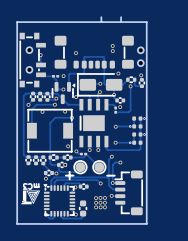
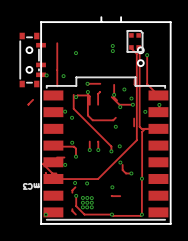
board edge: (41, 22) (17, 22) (17, 223) (41, 223) -> (41, 22) (41, 223)
board edge: (146, 22) (146, 223) -> (146, 22) (170, 22) (170, 223) (146, 223)
part: none -> (135, 41)
track: none -> (57, 43) (57, 86)
track: none -> (131, 47) (136, 53) (136, 140) (98, 179) (53, 179)
track: none -> (138, 47) (139, 126) (141, 128) (158, 128)
part: (94, 52) -> none
track: (40, 55) (41, 64) -> none
via: (40, 55) -> none
track: none -> (147, 55) (147, 84) (158, 95)
via: none -> (147, 55)
via: (118, 73) -> none
track: (41, 74) (53, 76) (56, 80) (56, 86) (59, 89) (63, 89) -> none
via: none -> (46, 75)
via: (141, 75) -> none
part: (55, 76) -> none
track: (127, 79) (122, 84) (105, 84) (104, 57) (85, 56) (84, 72) (70, 73) (69, 86) -> none
part: (131, 79) -> none
via: none -> (87, 83)
via: (100, 83) -> none
part: (141, 83) -> none
part: (99, 84) -> none
track: (130, 86) (130, 110) (128, 112) (115, 112) -> none
via: (130, 86) -> none
via: (63, 89) -> none
via: none -> (124, 89)
track: none -> (87, 92) (87, 115) (92, 120) (113, 120) (115, 117)
via: none -> (87, 92)
via: (99, 92) -> none
part: (63, 93) -> none
track: none -> (73, 94) (73, 108) (111, 146) (111, 151)
part: (33, 96) -> none
part: (40, 96) -> none
part: (47, 96) -> none
track: none -> (111, 97) (119, 104) (132, 104)
track: (56, 98) (47, 99) -> none
via: (56, 98) -> none
via: none -> (131, 98)
part: (120, 100) -> none
via: (28, 104) -> none
track: (54, 104) (36, 104) (31, 109) (31, 130) -> none
via: (54, 104) -> none
track: (81, 104) (68, 104) (57, 93) (26, 93) (23, 95) (23, 154) (26, 157) (43, 157) -> none
track: (106, 104) (113, 104) (115, 108) -> none
via: none -> (132, 104)
via: none -> (159, 104)
part: (115, 110) -> none
via: (42, 111) -> none
via: none -> (145, 111)
part: (138, 118) -> none
track: (140, 118) (139, 150) (107, 150) (106, 141) -> none
part: (93, 123) -> none
track: (134, 126) (115, 126) -> none
part: (136, 126) -> none
track: none -> (145, 128) (142, 131) (140, 215) (84, 214) (76, 206) (76, 195)
part: (50, 130) -> none
track: (68, 130) (72, 126) (72, 117) (55, 117) (50, 122) (50, 163) (58, 164) (60, 172) (78, 172) (80, 167) -> none
track: (134, 134) (134, 142) (115, 142) -> none
part: (138, 134) -> none
via: none -> (72, 142)
via: (115, 142) -> none
part: (136, 142) -> none
track: none -> (53, 145) (74, 146) (76, 148) (76, 156)
via: (68, 146) -> none
via: none -> (119, 146)
part: none -> (105, 148)
track: (76, 151) (81, 154) -> none
via: (76, 151) -> none
via: none -> (111, 151)
part: (83, 154) -> none
via: none -> (76, 156)
track: (111, 156) (108, 159) (108, 185) (113, 189) (120, 189) -> none
via: (111, 156) -> none
part: (53, 157) -> none
part: (67, 157) -> none
track: (70, 157) (83, 157) (86, 154) (99, 167) -> none
part: (28, 160) -> none
part: (36, 160) -> none
part: (43, 160) -> none
track: (120, 162) (115, 162) (112, 165) (112, 183) (120, 183) -> none
part: (62, 164) -> none
track: none -> (122, 164) (122, 170) (125, 173) (131, 173)
part: (80, 167) -> none
part: (99, 167) -> none
part: (48, 172) -> none
via: (56, 173) -> none
via: none -> (131, 173)
text: + (69, 175) -> none
text: - (110, 175) -> none
via: (45, 178) -> none
track: (108, 178) (54, 177) (51, 180) (51, 188) -> none
via: none -> (141, 178)
via: none -> (75, 183)
via: none -> (87, 183)
track: (100, 183) (97, 180) (56, 180) (54, 182) (54, 188) -> none
via: (100, 183) -> none
via: (112, 183) -> none
track: (80, 186) (79, 183) (65, 183) (64, 188) -> none
part: (83, 186) -> none
via: (75, 187) -> none
via: none -> (112, 187)
drawing: [21, 190, 41, 205] -> none
part: (128, 192) -> none
via: none -> (76, 195)
via: (111, 195) -> none
via: none -> (82, 197)
via: none -> (87, 197)
via: (100, 197) -> none
via: (104, 197) -> none
via: none -> (91, 198)
via: (96, 198) -> none
part: (59, 200) -> none
via: none -> (82, 202)
via: none -> (87, 202)
via: none -> (91, 202)
via: (96, 202) -> none
via: (100, 202) -> none
via: (104, 202) -> none
via: none -> (82, 207)
via: none -> (87, 207)
via: none -> (91, 207)
via: (96, 207) -> none
via: (100, 207) -> none
via: (104, 207) -> none
part: (83, 208) -> none
track: (54, 213) (52, 218) (49, 218) (45, 214) -> none
track: (83, 213) (81, 218) (62, 218) (61, 213) -> none
via: (75, 214) -> none
via: none -> (111, 214)
via: none -> (141, 214)

